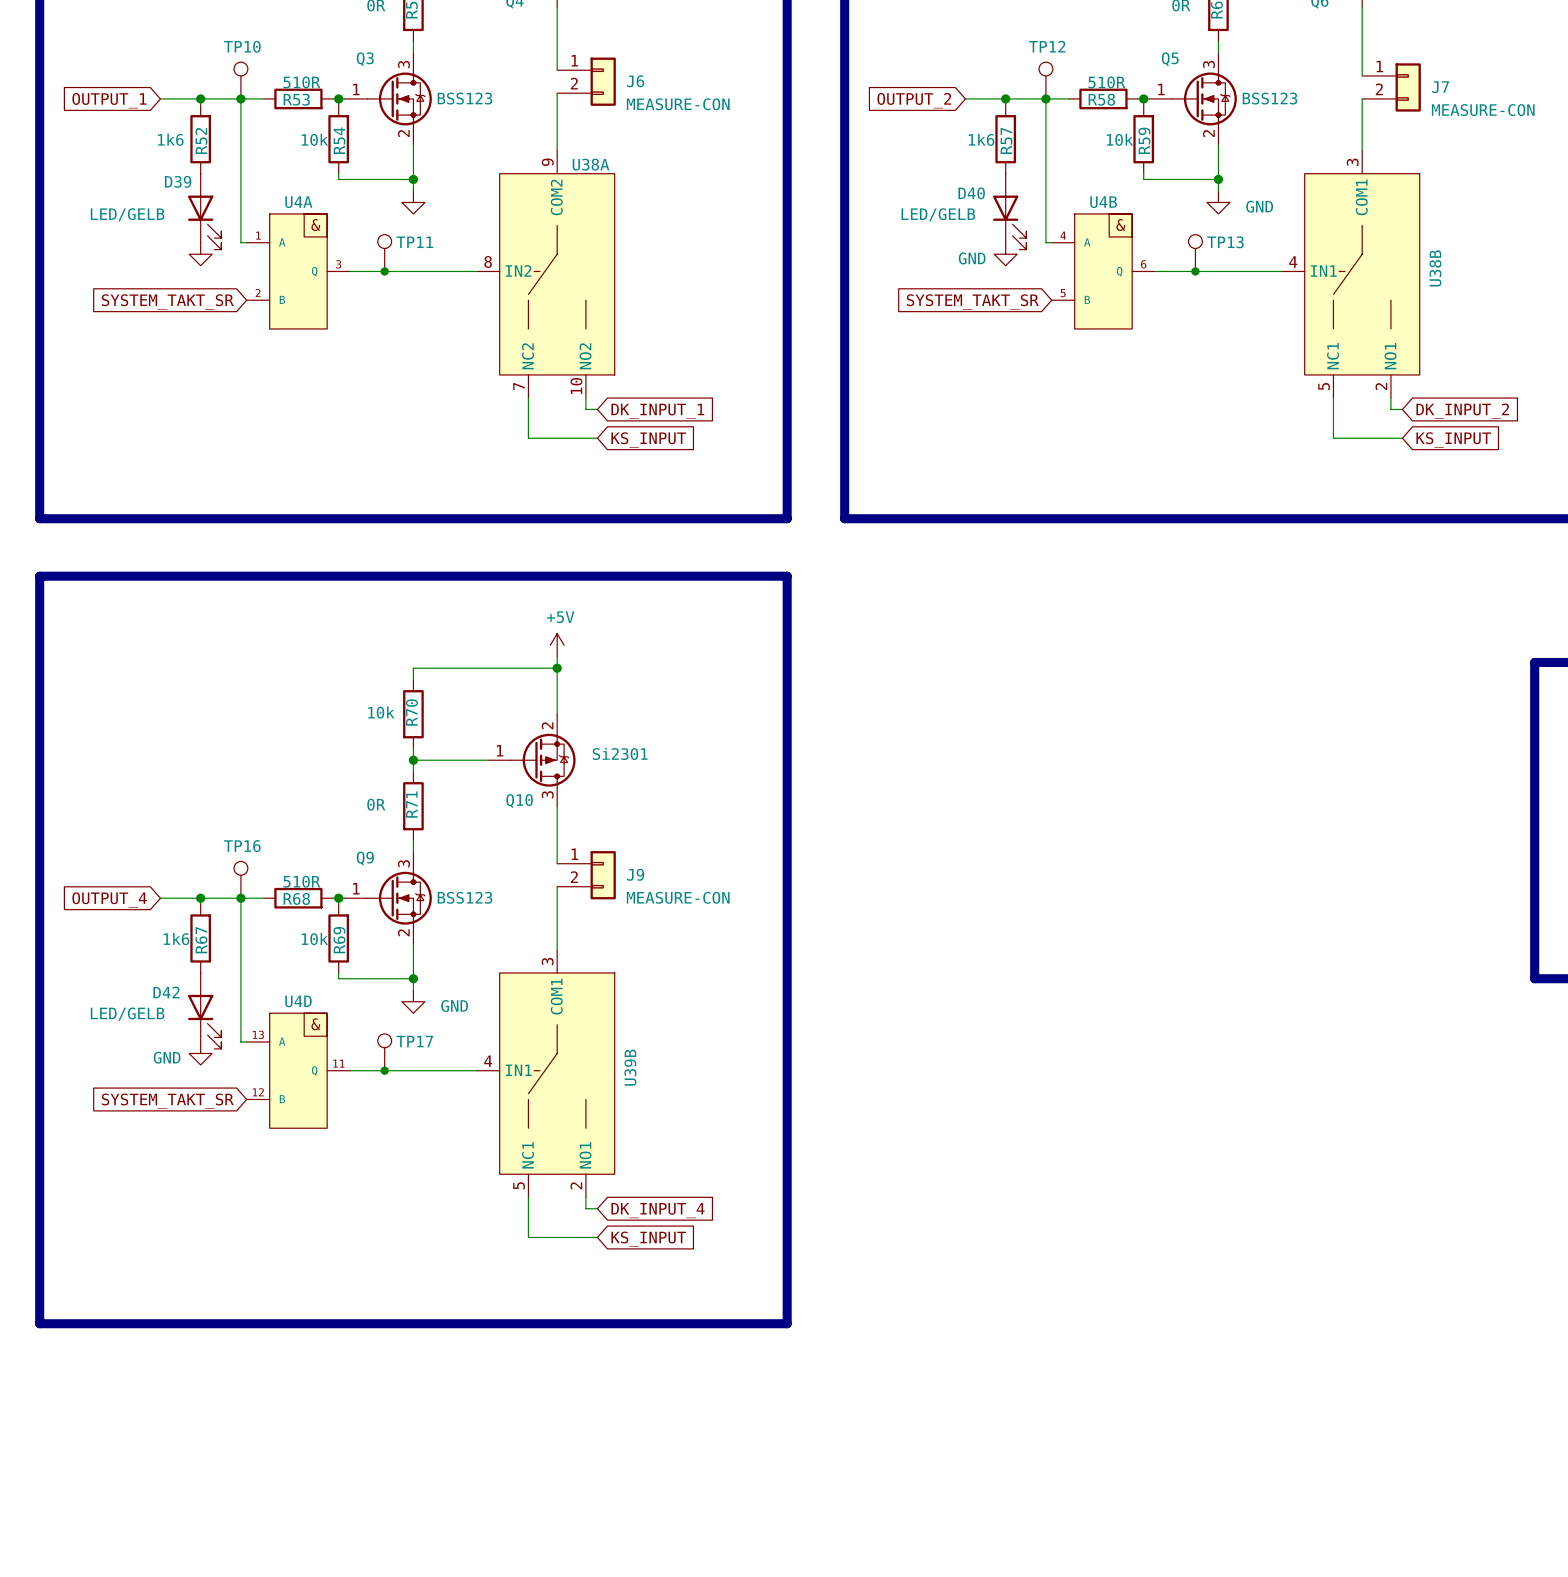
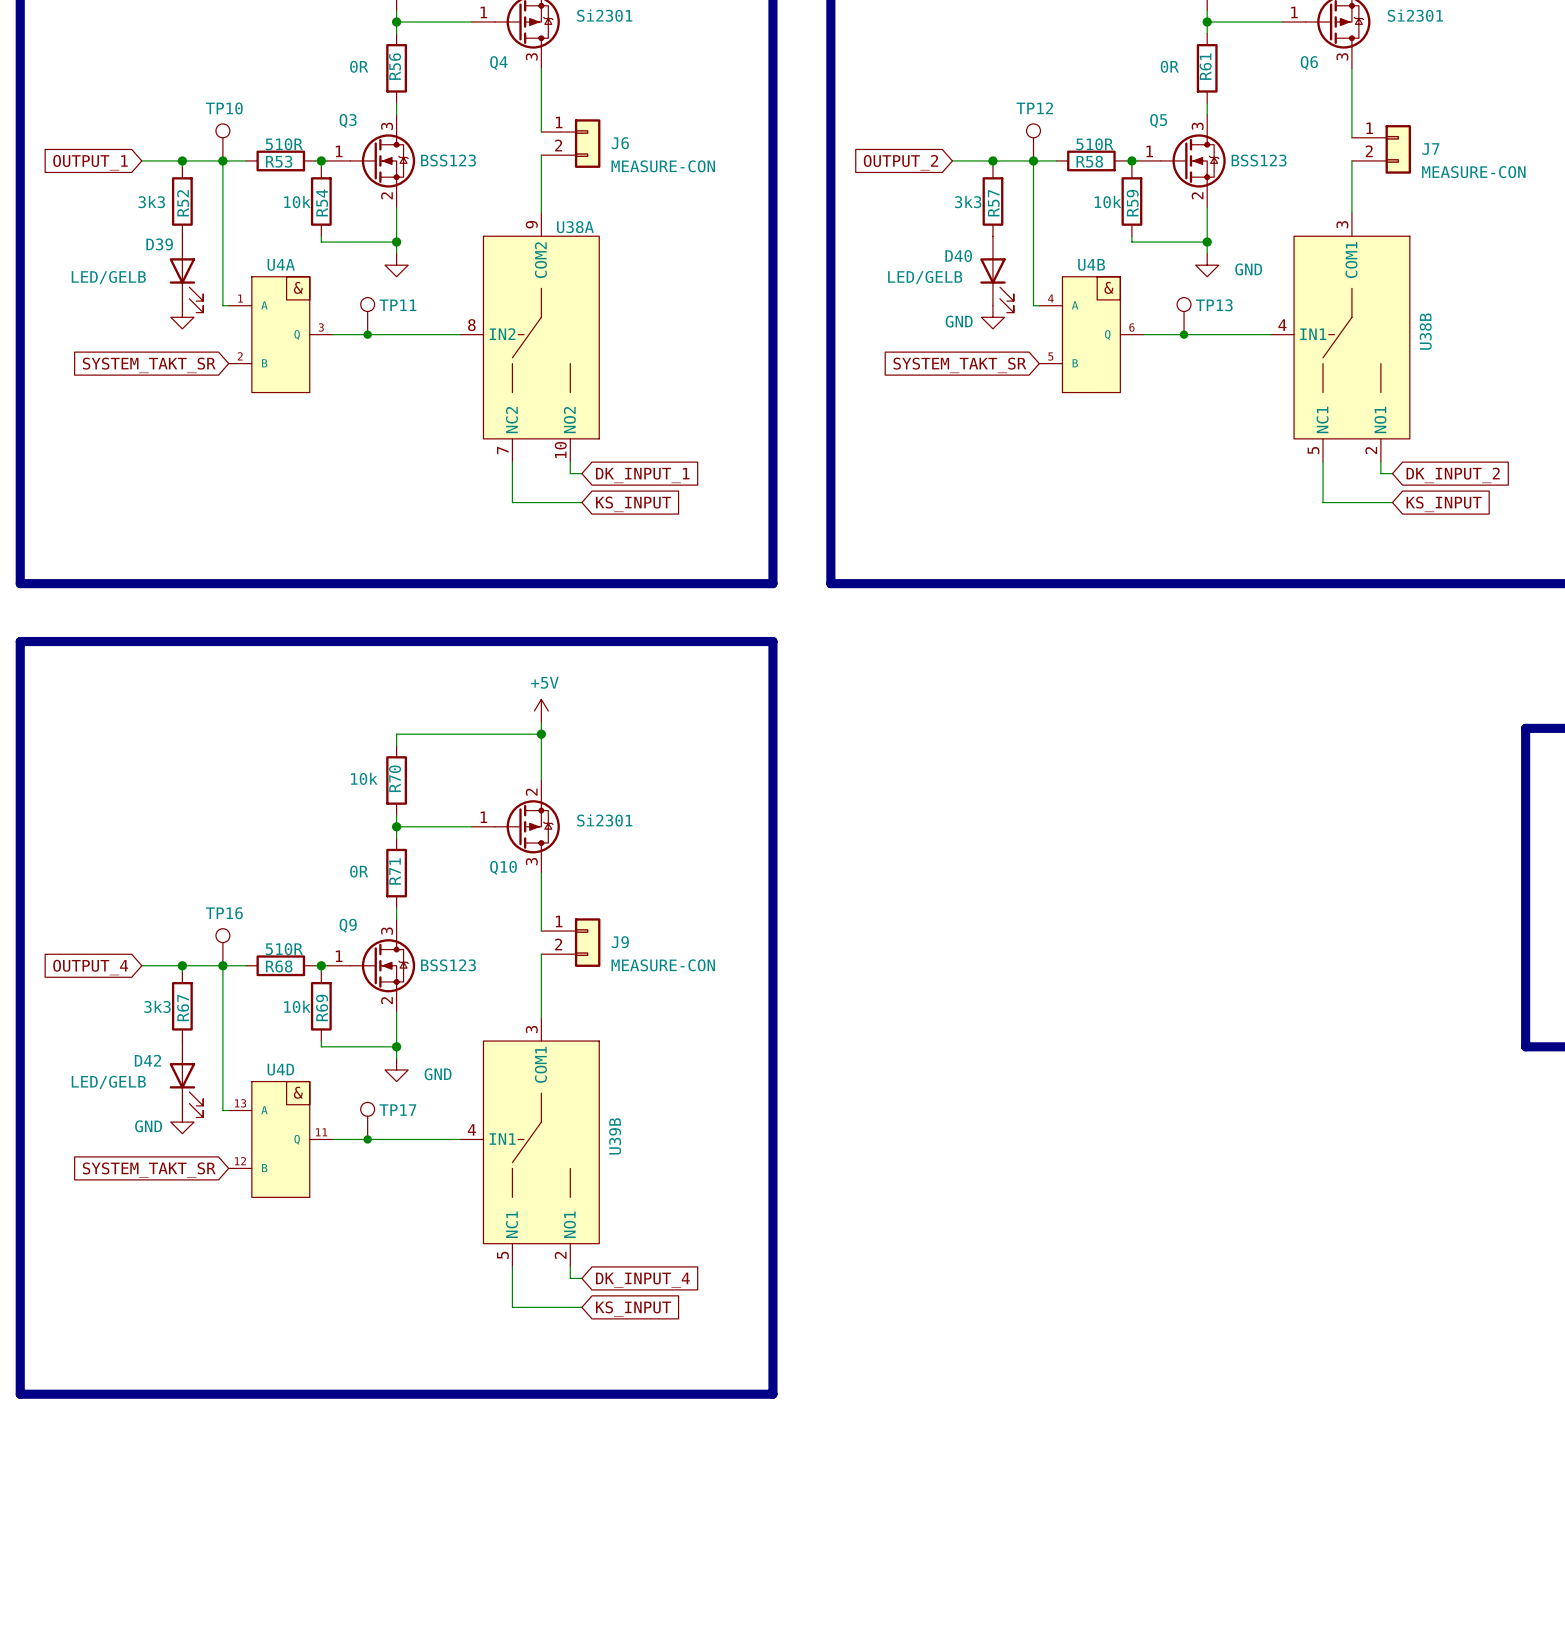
R52 value: 1k6 (170, 139) -> 3k3 (151, 202)
R57 value: 1k6 (981, 139) -> 3k3 (968, 202)
R67 value: 1k6 (176, 939) -> 3k3 (157, 1006)

